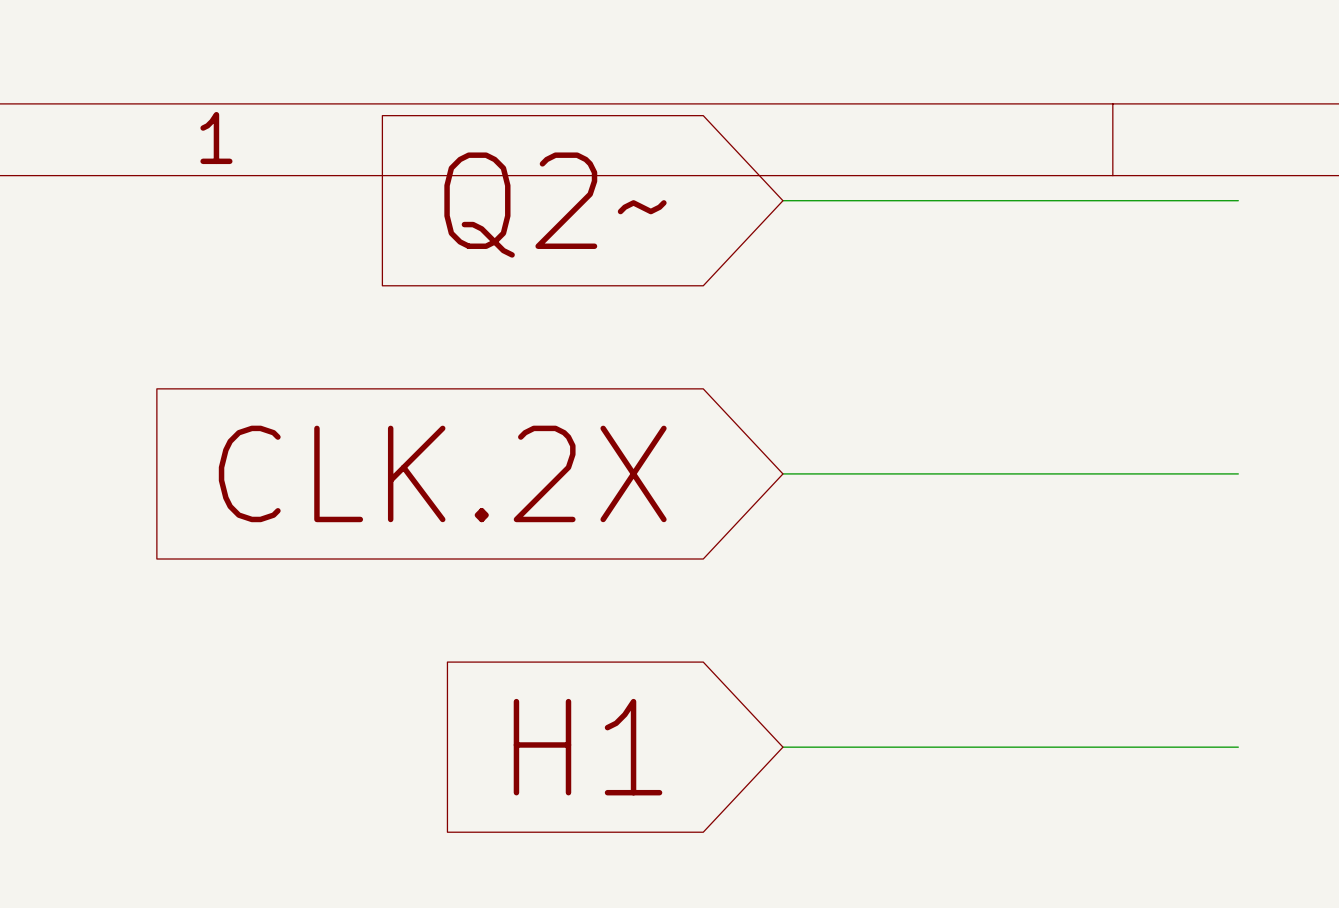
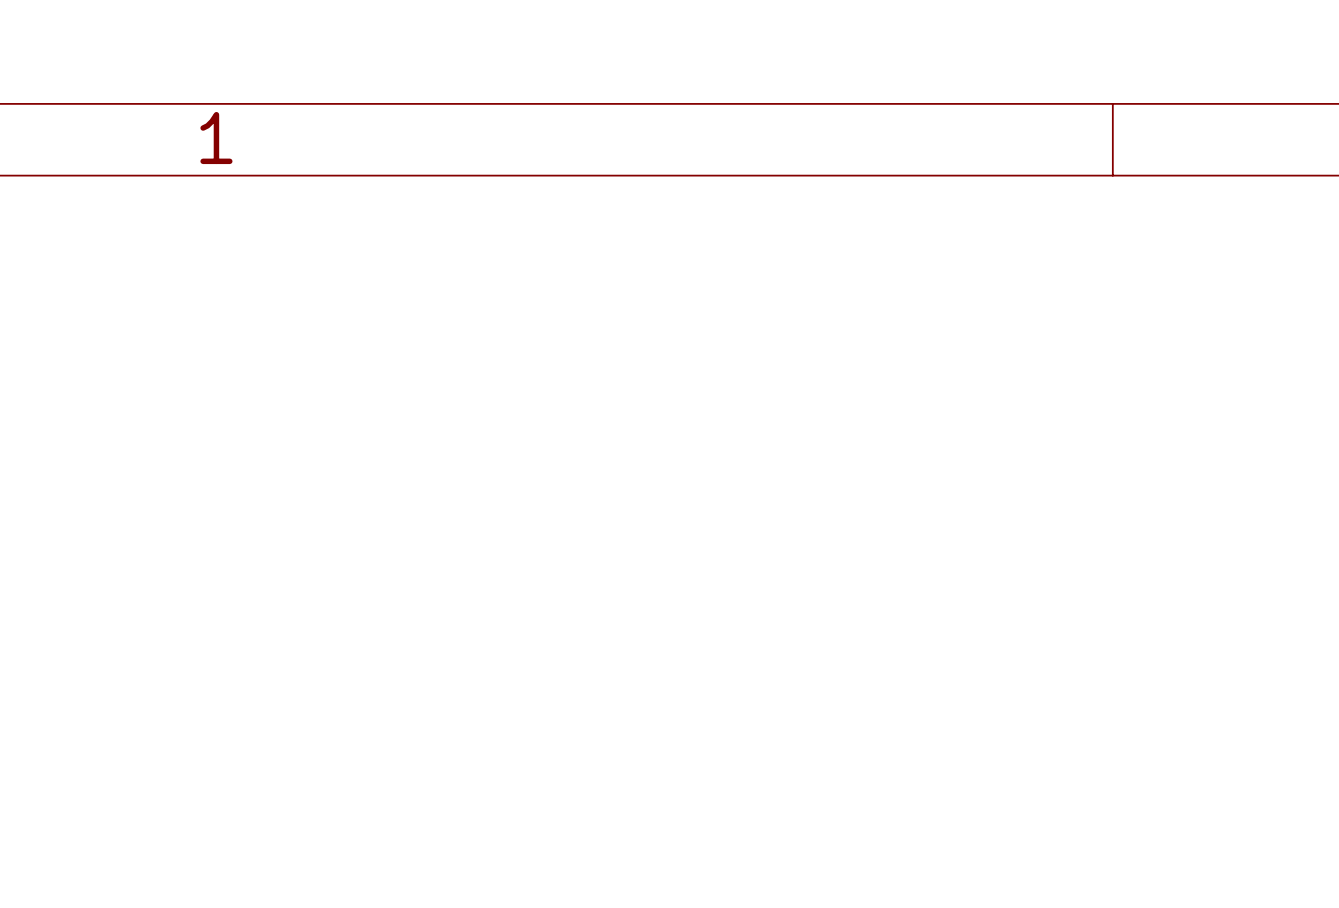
wire: (782, 200) (1238, 200) -> none
global label: Q2~ (555, 205) -> none
global label: CLK.2X (442, 473) -> none
wire: (782, 473) (1238, 473) -> none
global label: H1 (588, 747) -> none
wire: (782, 747) (1238, 747) -> none

